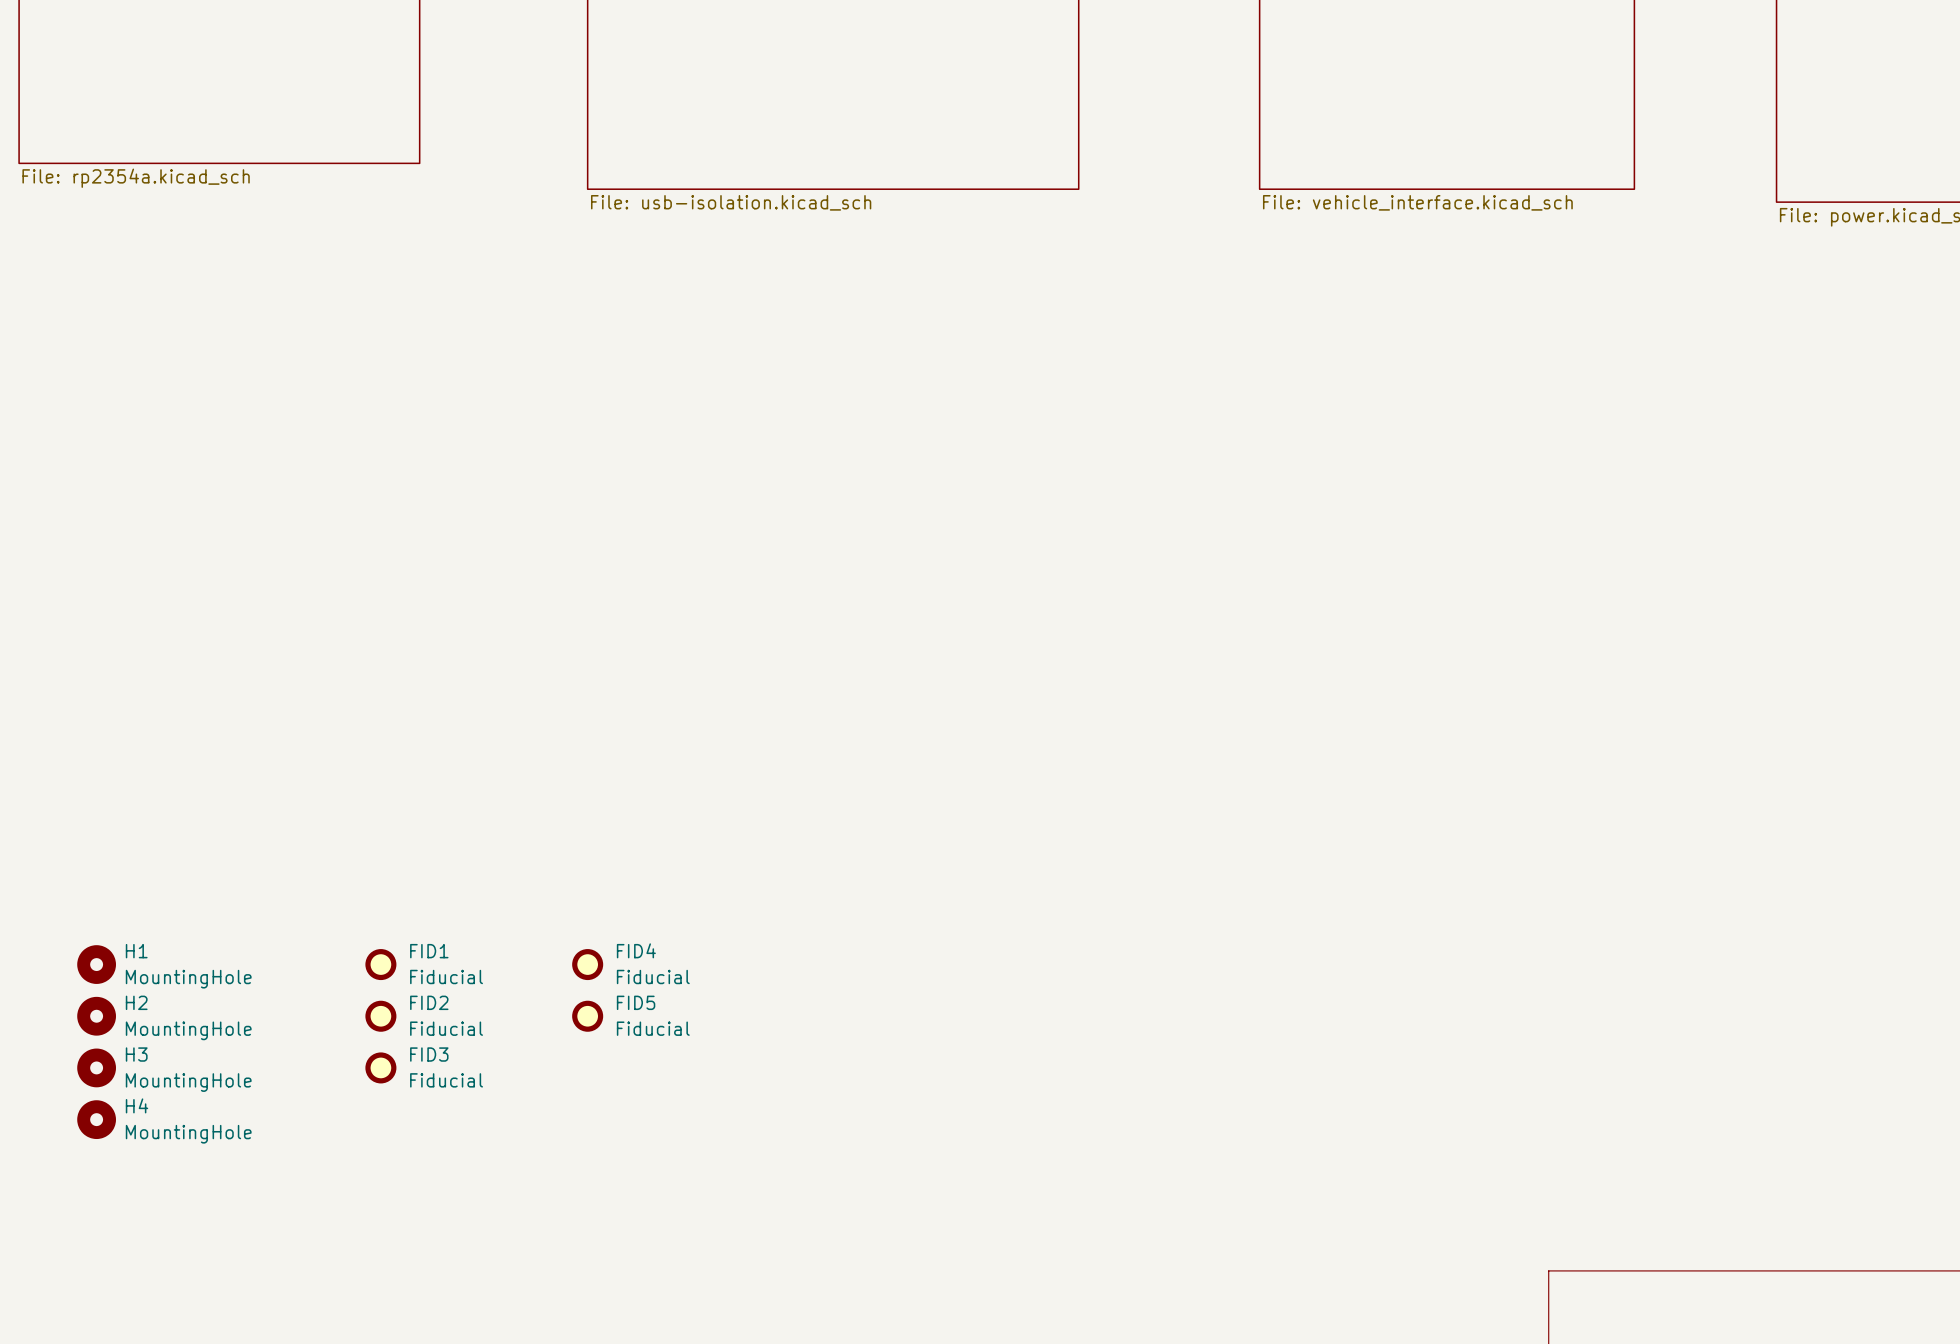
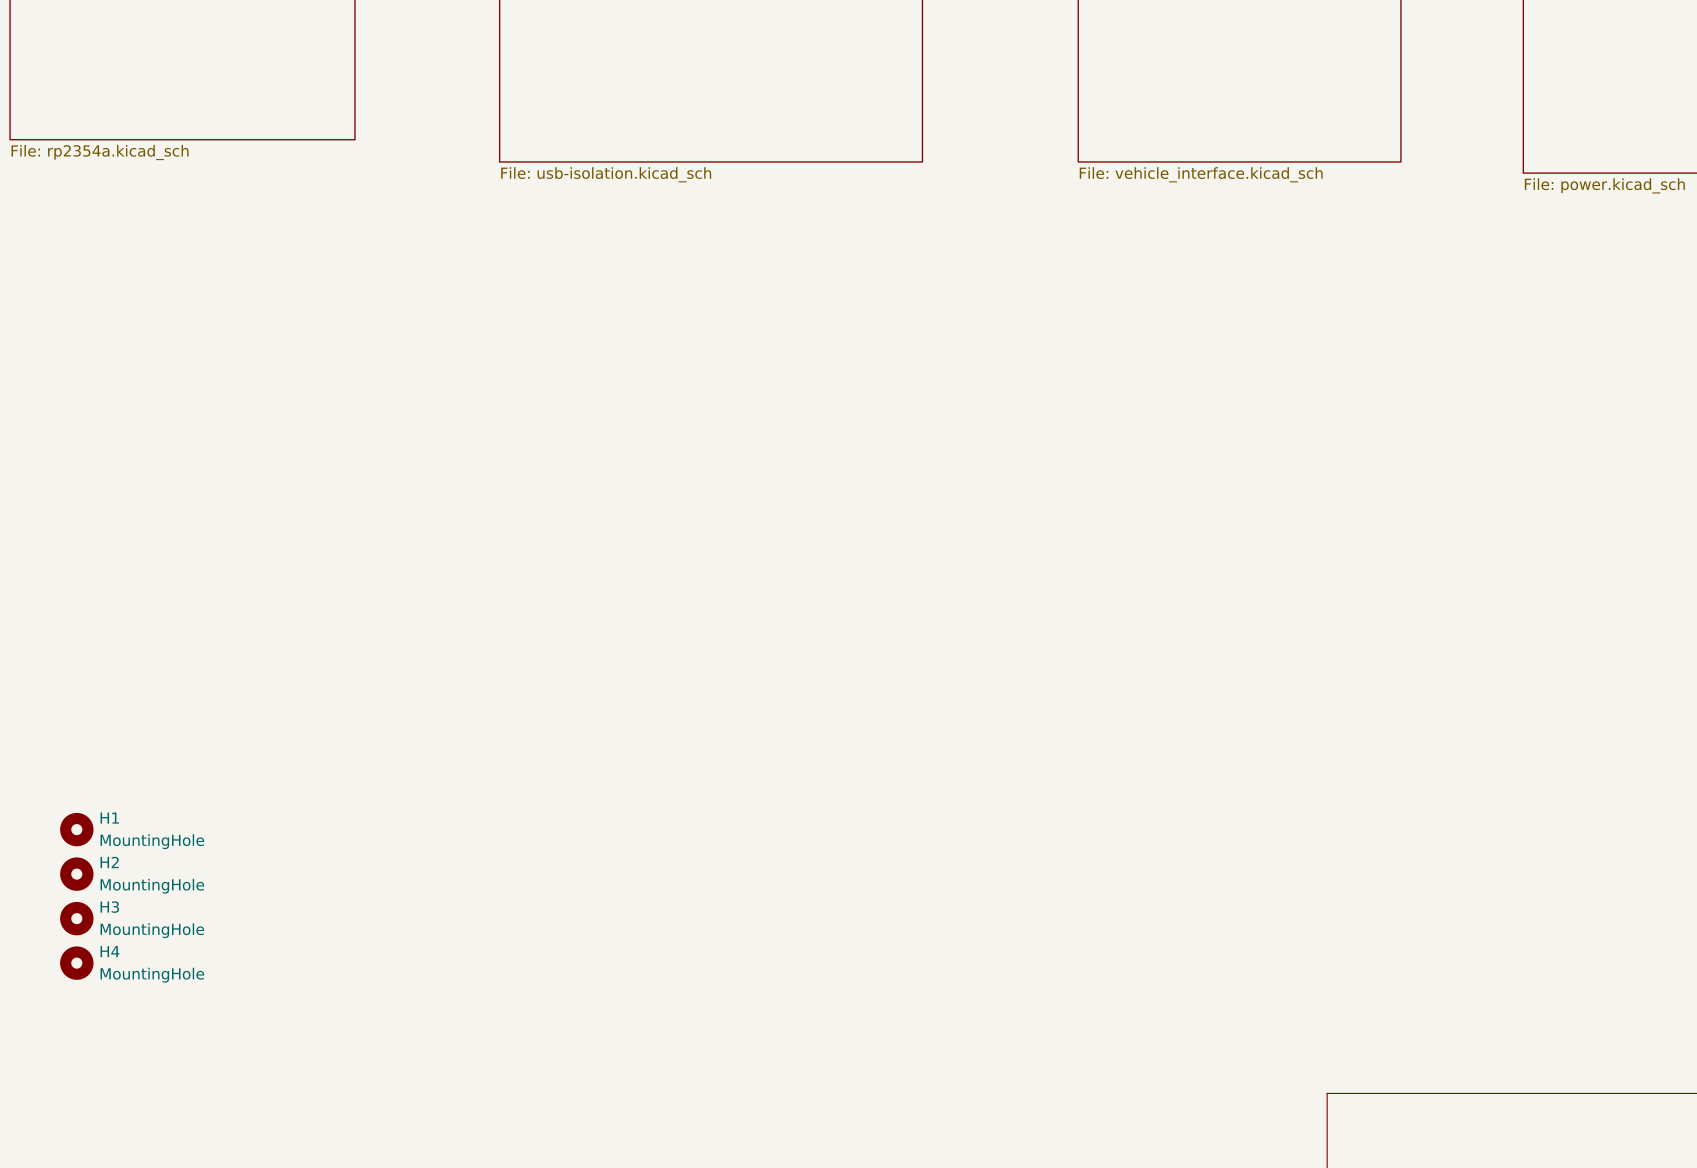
FID1: Fiducial (380, 964) -> none
FID4: Fiducial (587, 964) -> none
FID2: Fiducial (380, 1016) -> none
FID5: Fiducial (587, 1016) -> none
FID3: Fiducial (380, 1067) -> none

